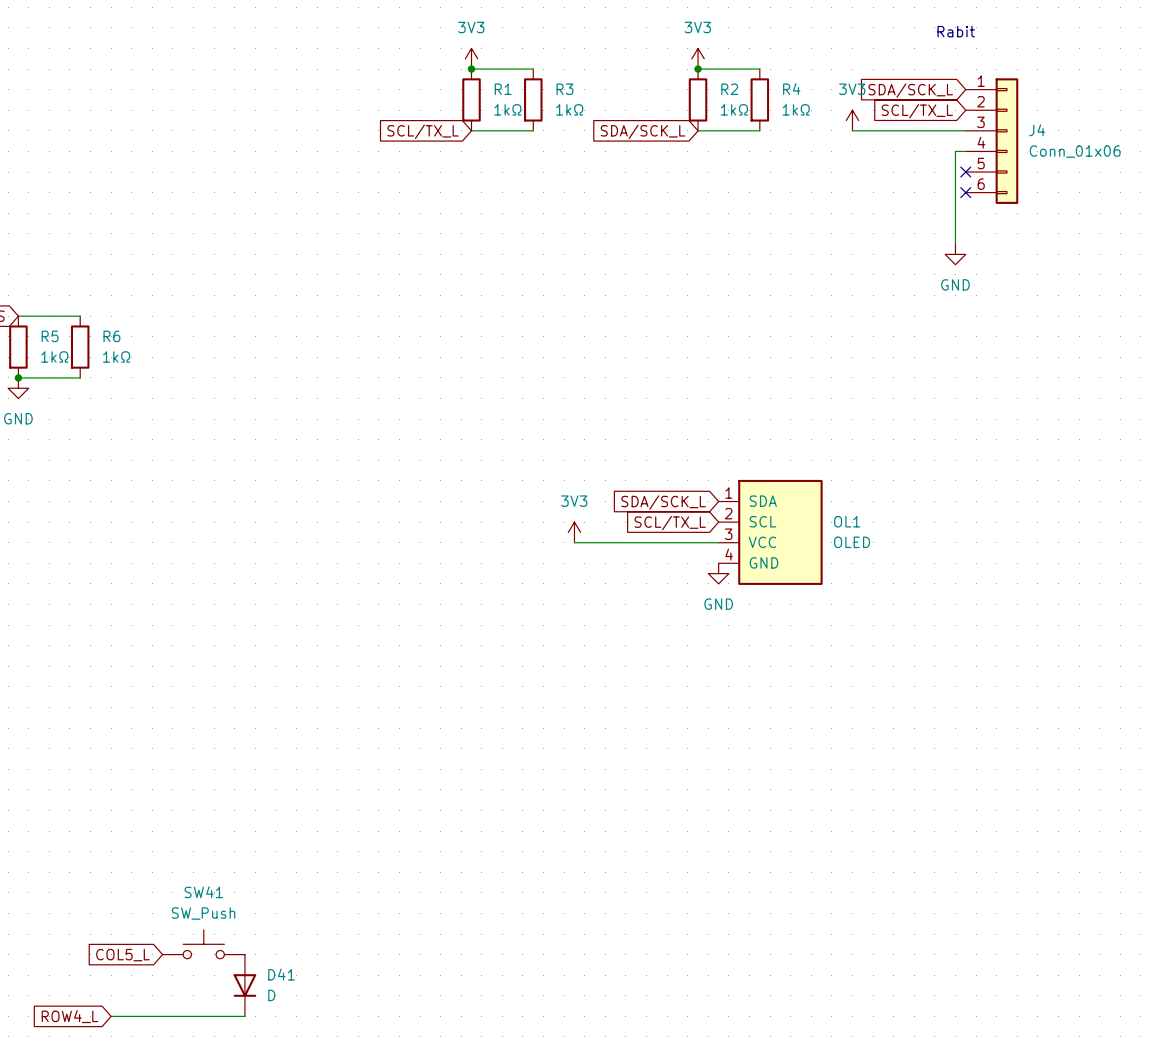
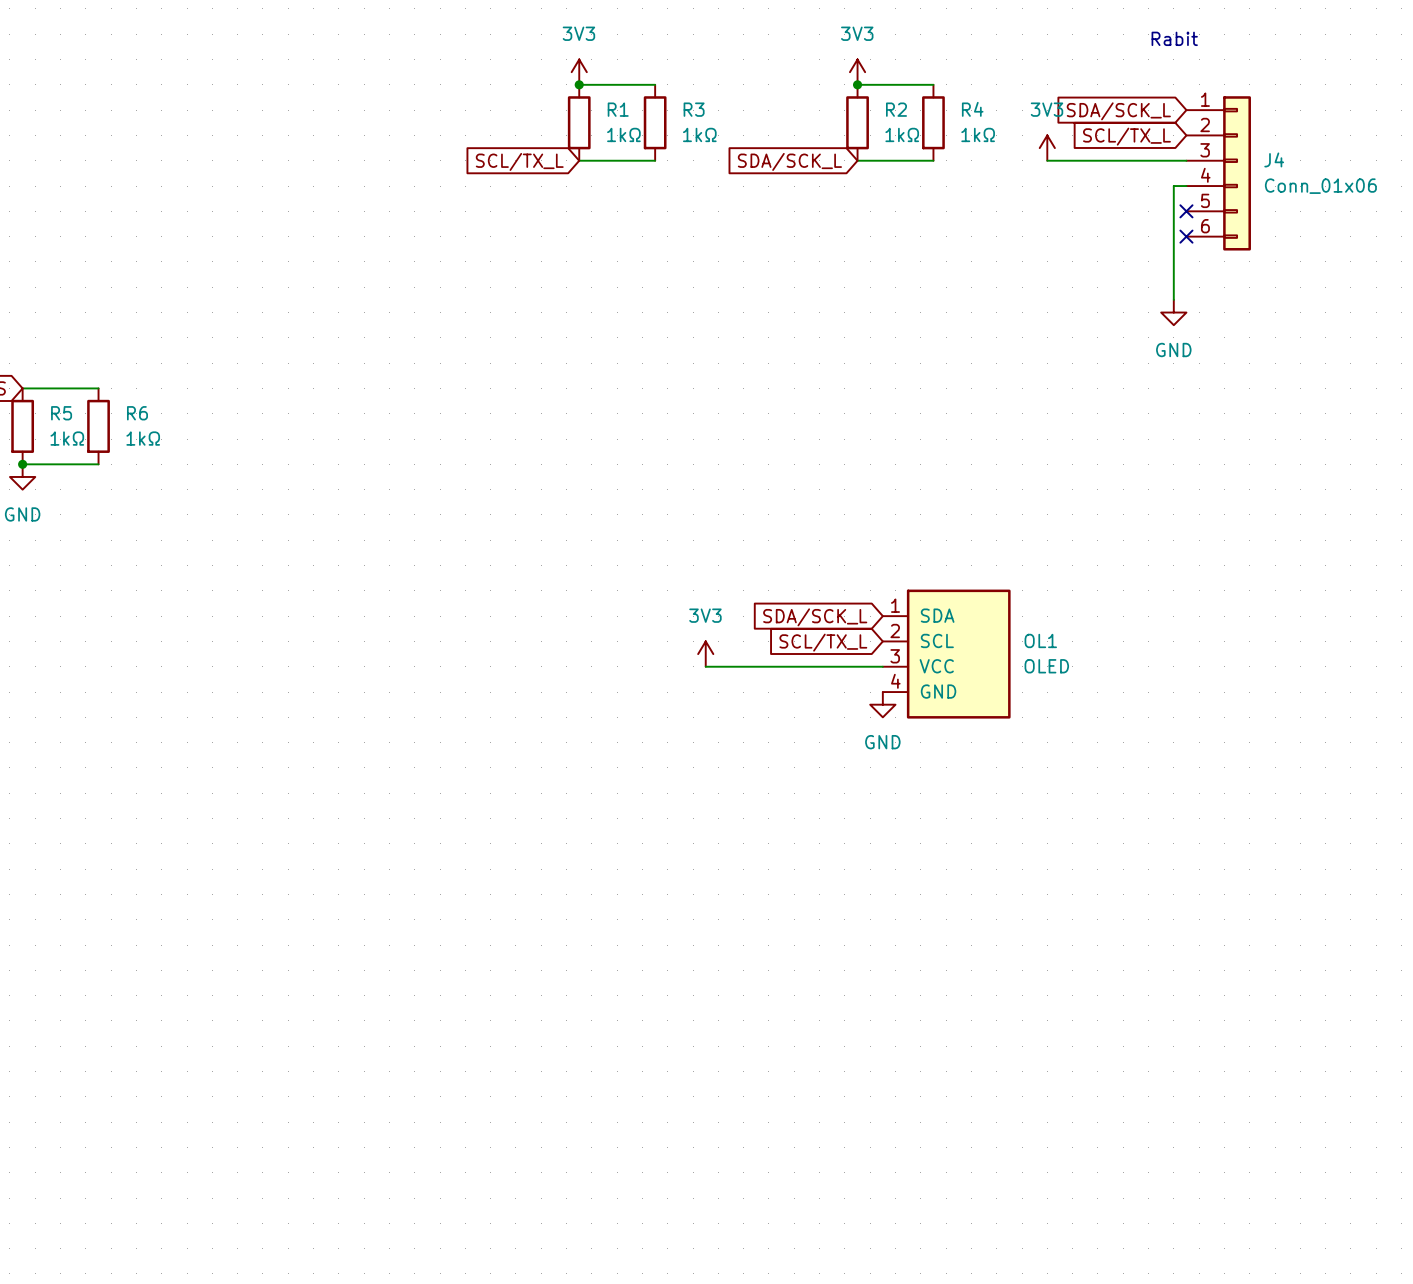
SW41: SW_Push (203, 944) -> none
global label: COL5_L (122, 955) -> none
D41: D (244, 985) -> none
global label: ROW4_L (70, 1016) -> none
wire: (111, 1016) (244, 1016) -> none

